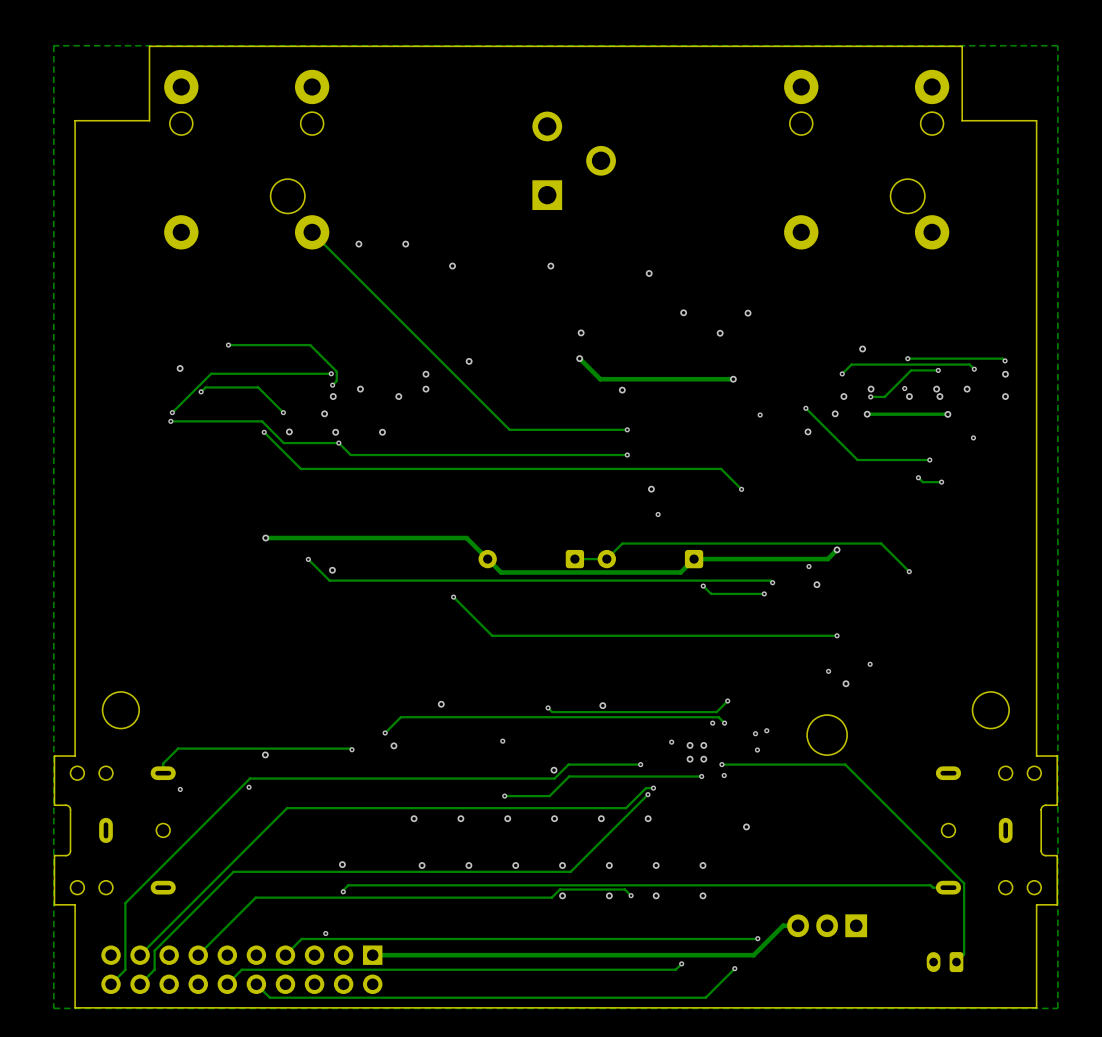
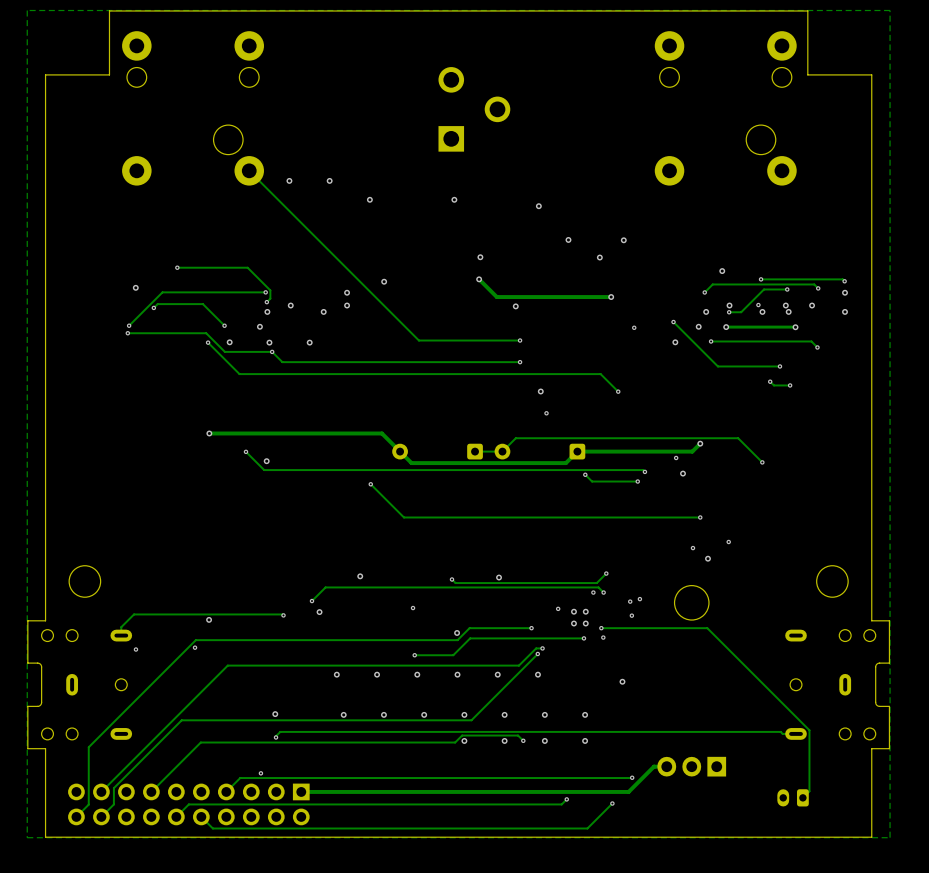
track: none -> (711, 341) (811, 341) (817, 347)
via: none -> (711, 341)

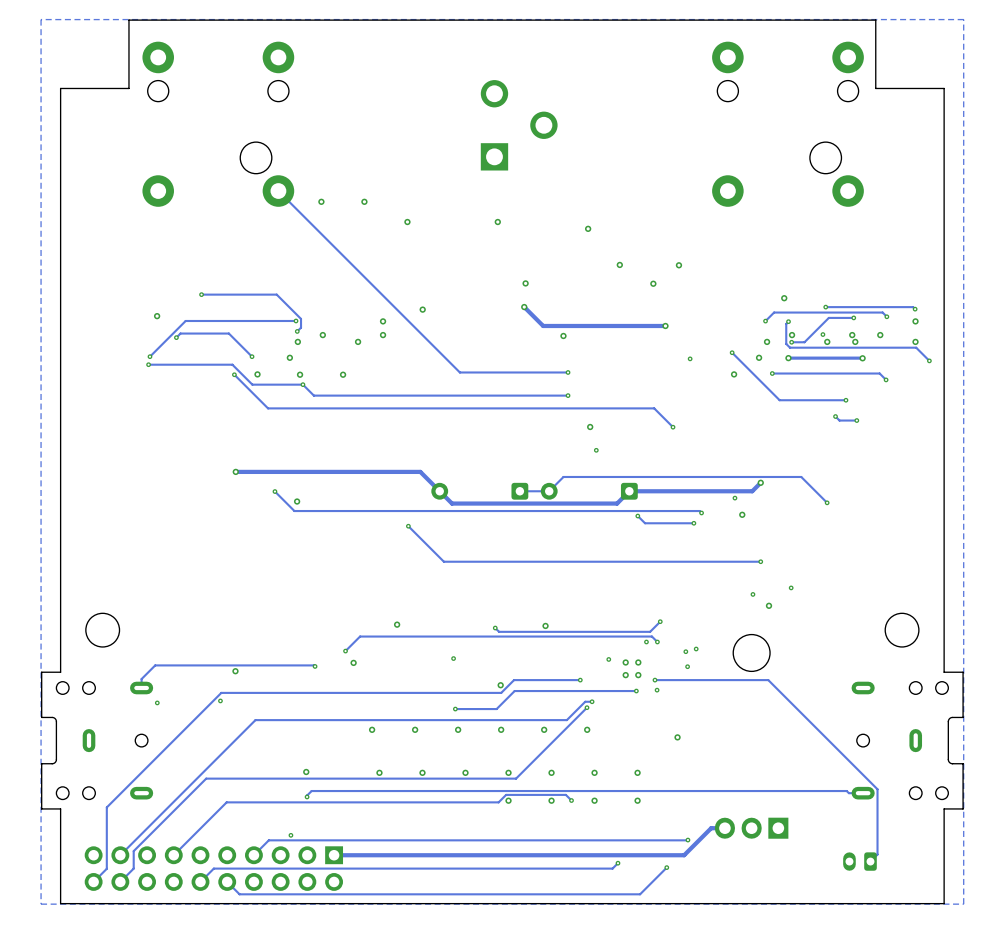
track: none -> (788, 321) (786, 323) (786, 343) (790, 347) (916, 347) (929, 360)
via: none -> (788, 321)
via: none -> (929, 360)

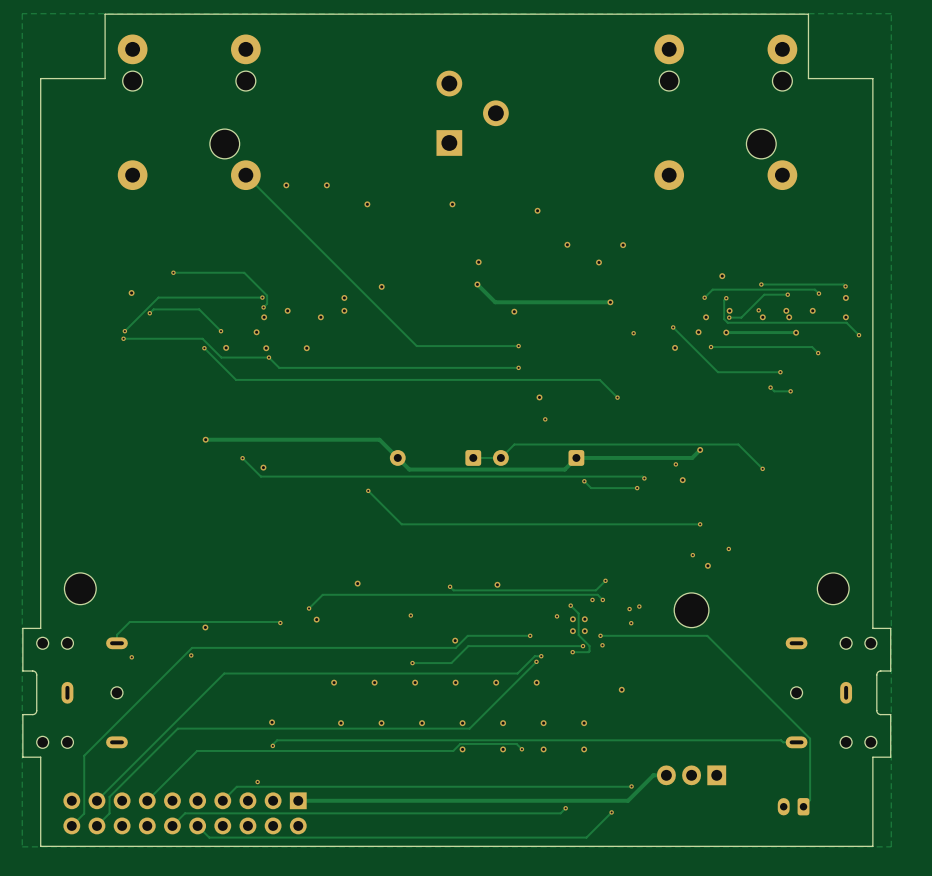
track: none -> (570, 605) (578, 613) (578, 635) (589, 645) (588, 652) (572, 652)
via: none -> (570, 605)
via: none -> (572, 652)

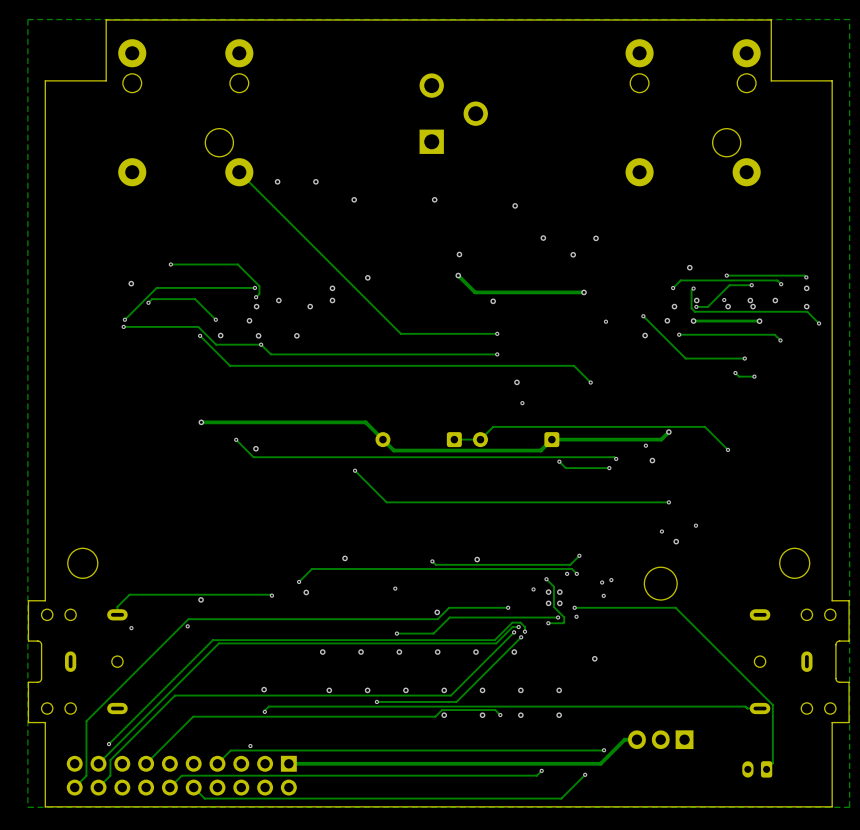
track: none -> (524, 631) (524, 627) (520, 622) (512, 622) (494, 640) (212, 640) (109, 744)
via: none -> (524, 631)
track: none -> (521, 637) (456, 701) (376, 701)
via: none -> (521, 637)
via: none -> (376, 701)
via: none -> (109, 744)

